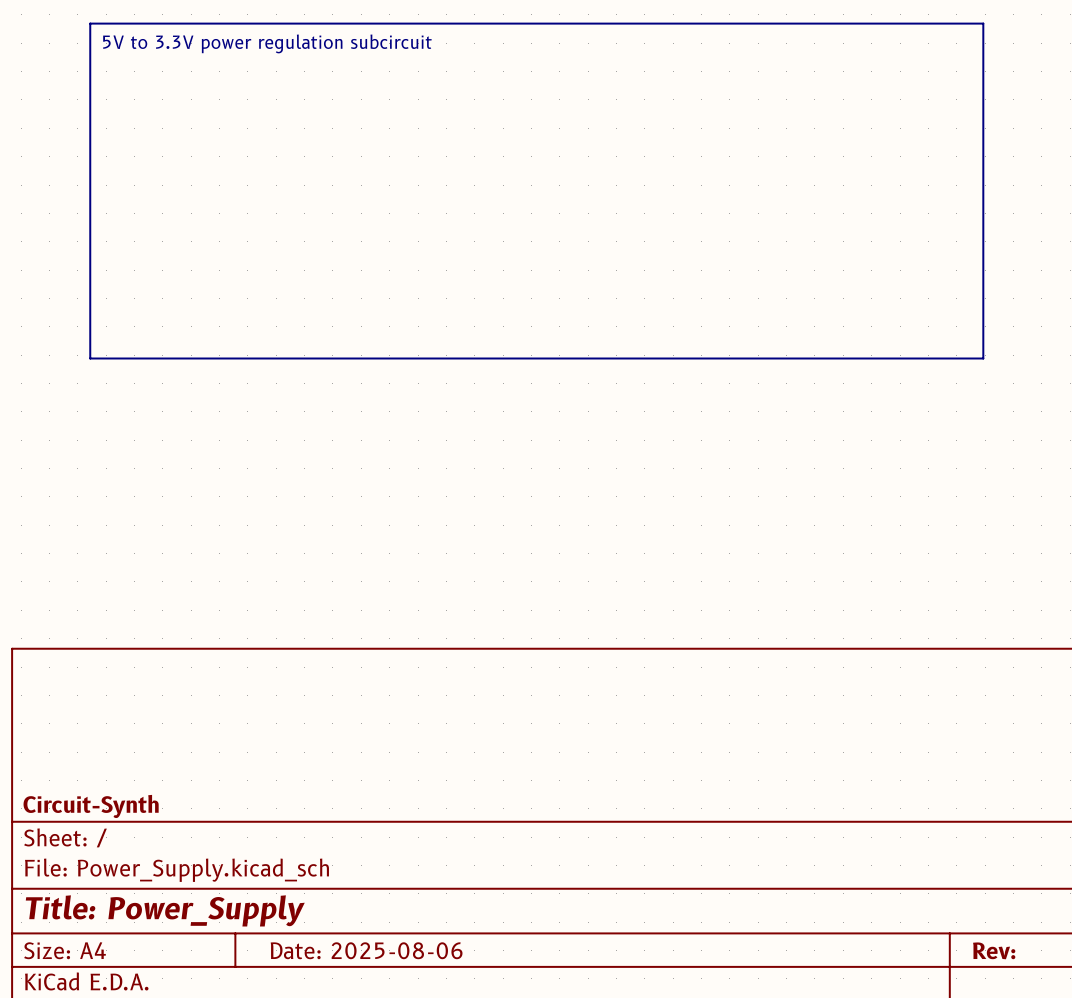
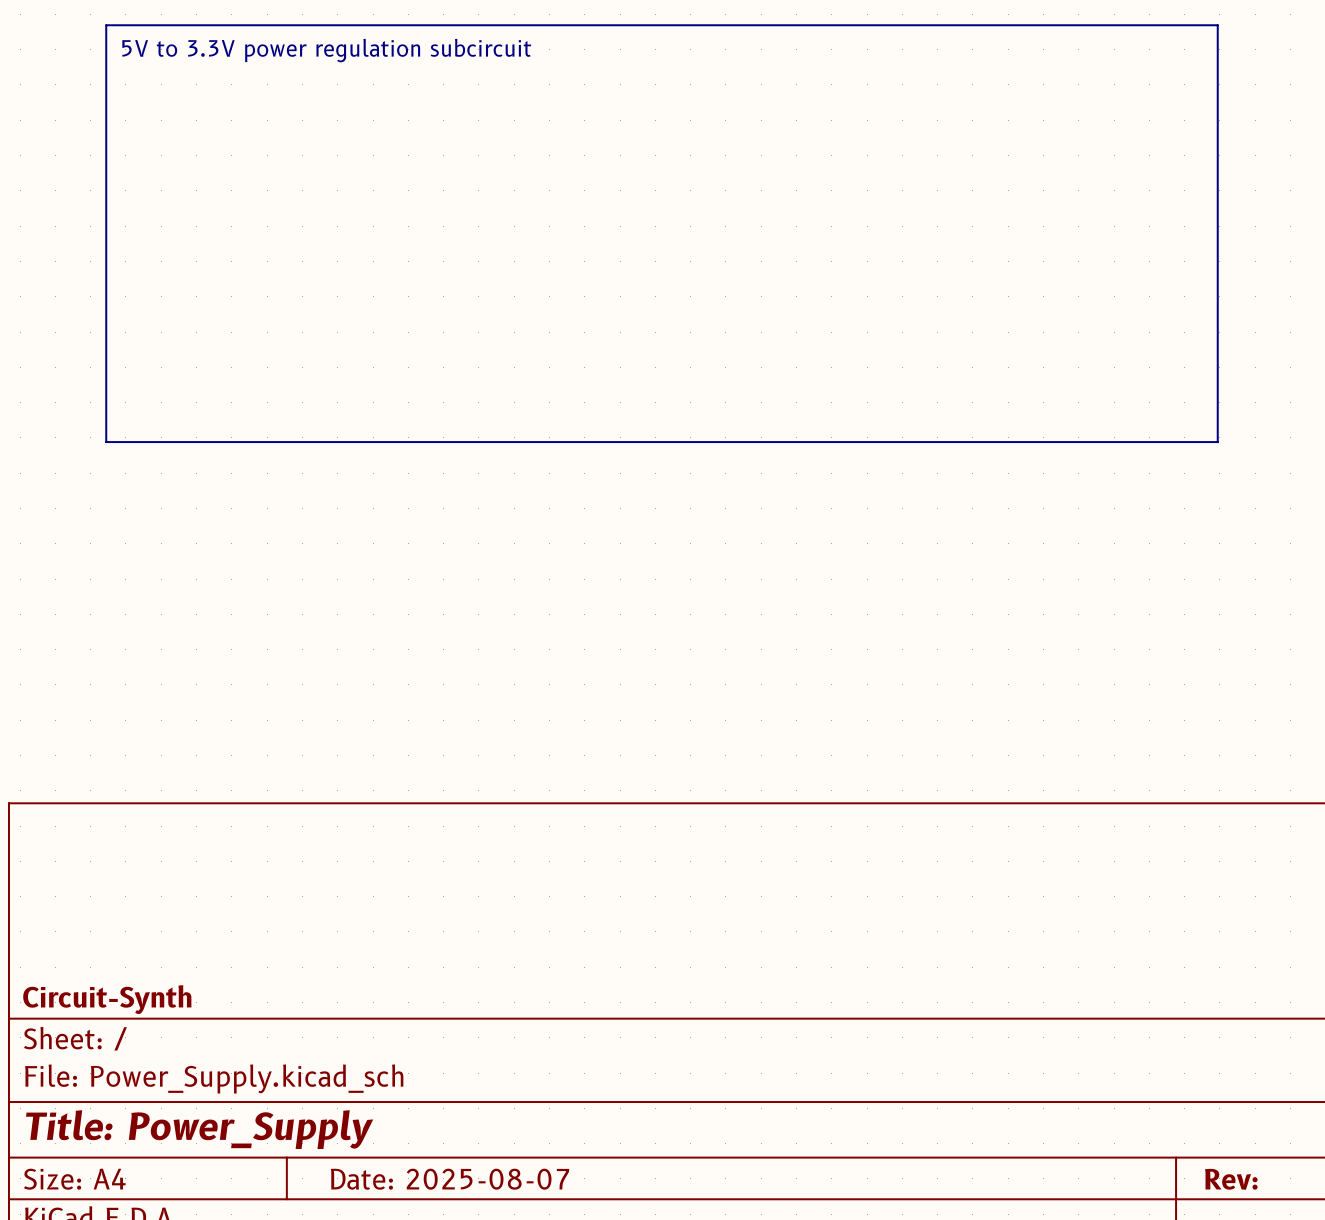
title block: Date: 2025-08-06 (366, 950) -> Date: 2025-08-07 (450, 1179)

